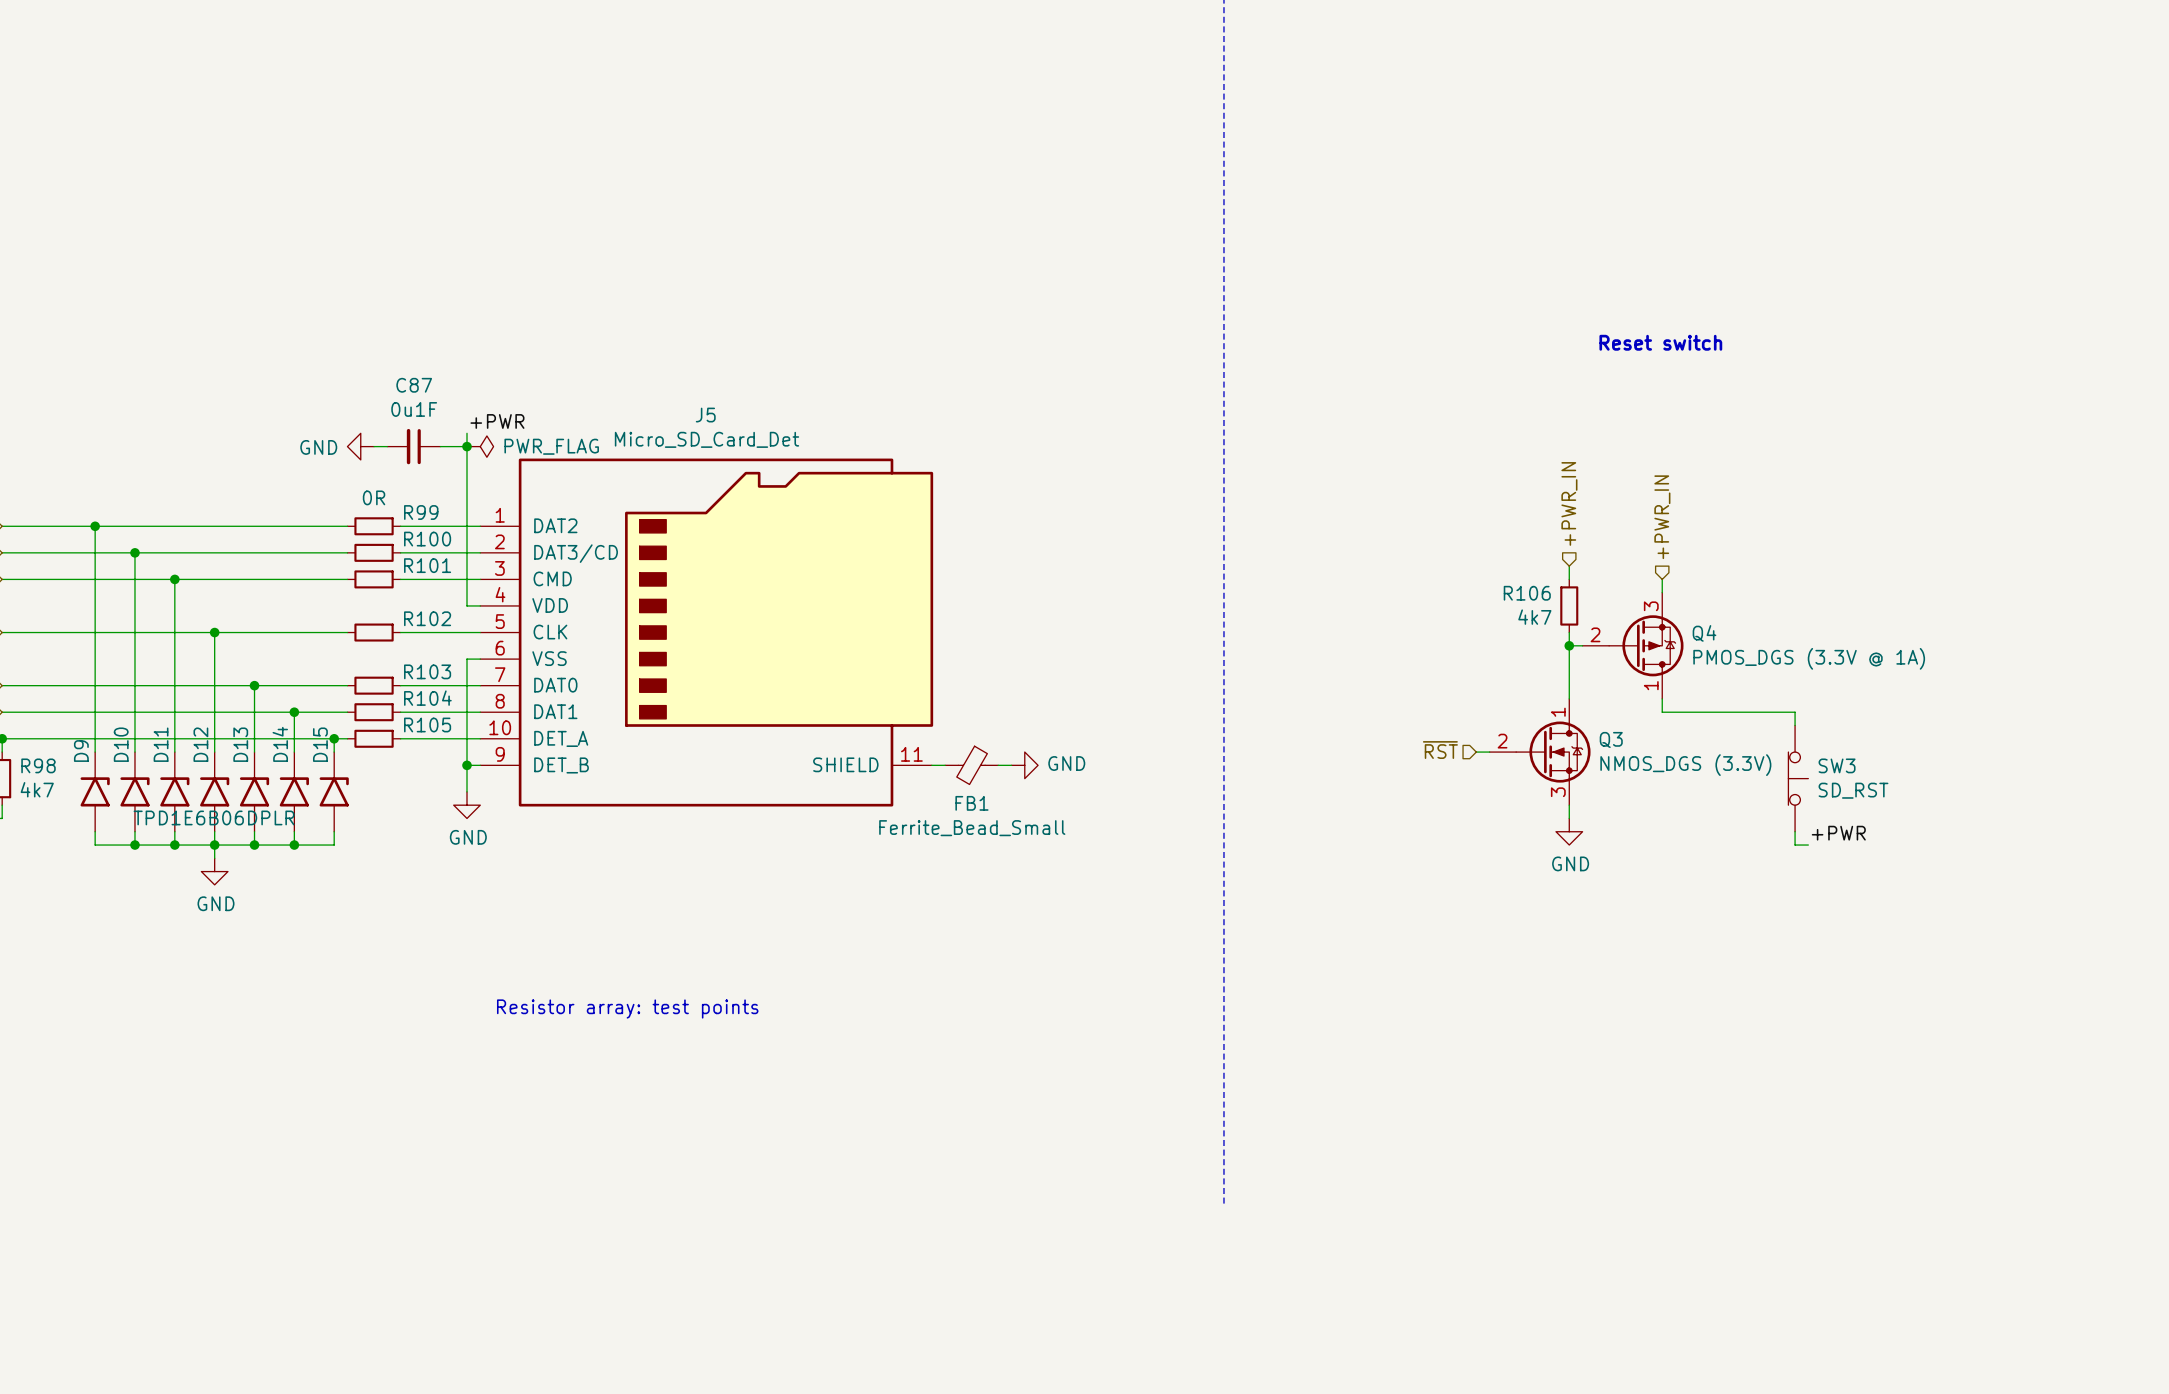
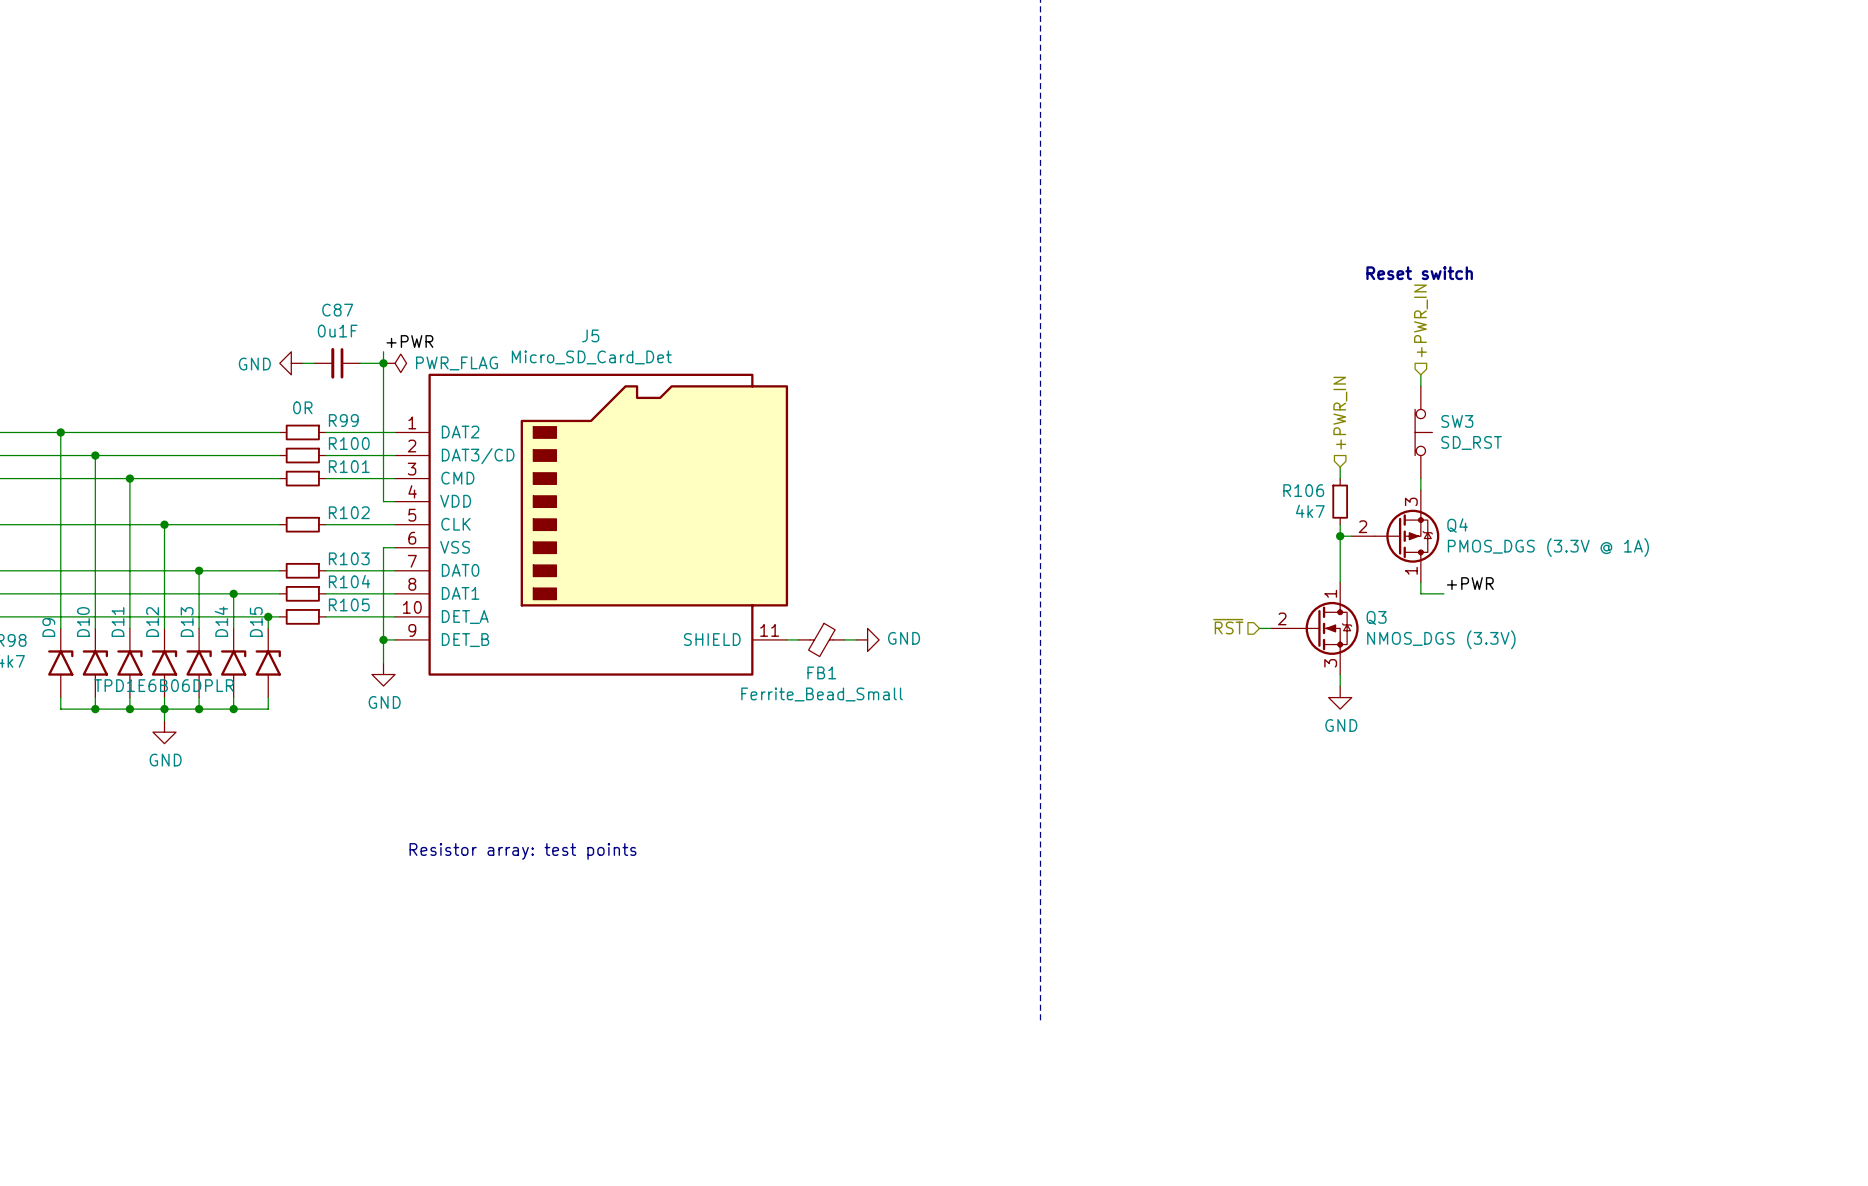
wire: none -> (1420, 374) (1420, 386)
hierarchical label position: +PWR_IN (1662, 517) -> +PWR_IN (1420, 320)
wire: (1688, 712) (1795, 712) (1795, 725) -> none
SW3 position: (1798, 778) -> (1423, 432)
wire: (1795, 831) (1795, 845) (1808, 845) -> none
label position: +PWR (1838, 833) -> +PWR (1470, 583)

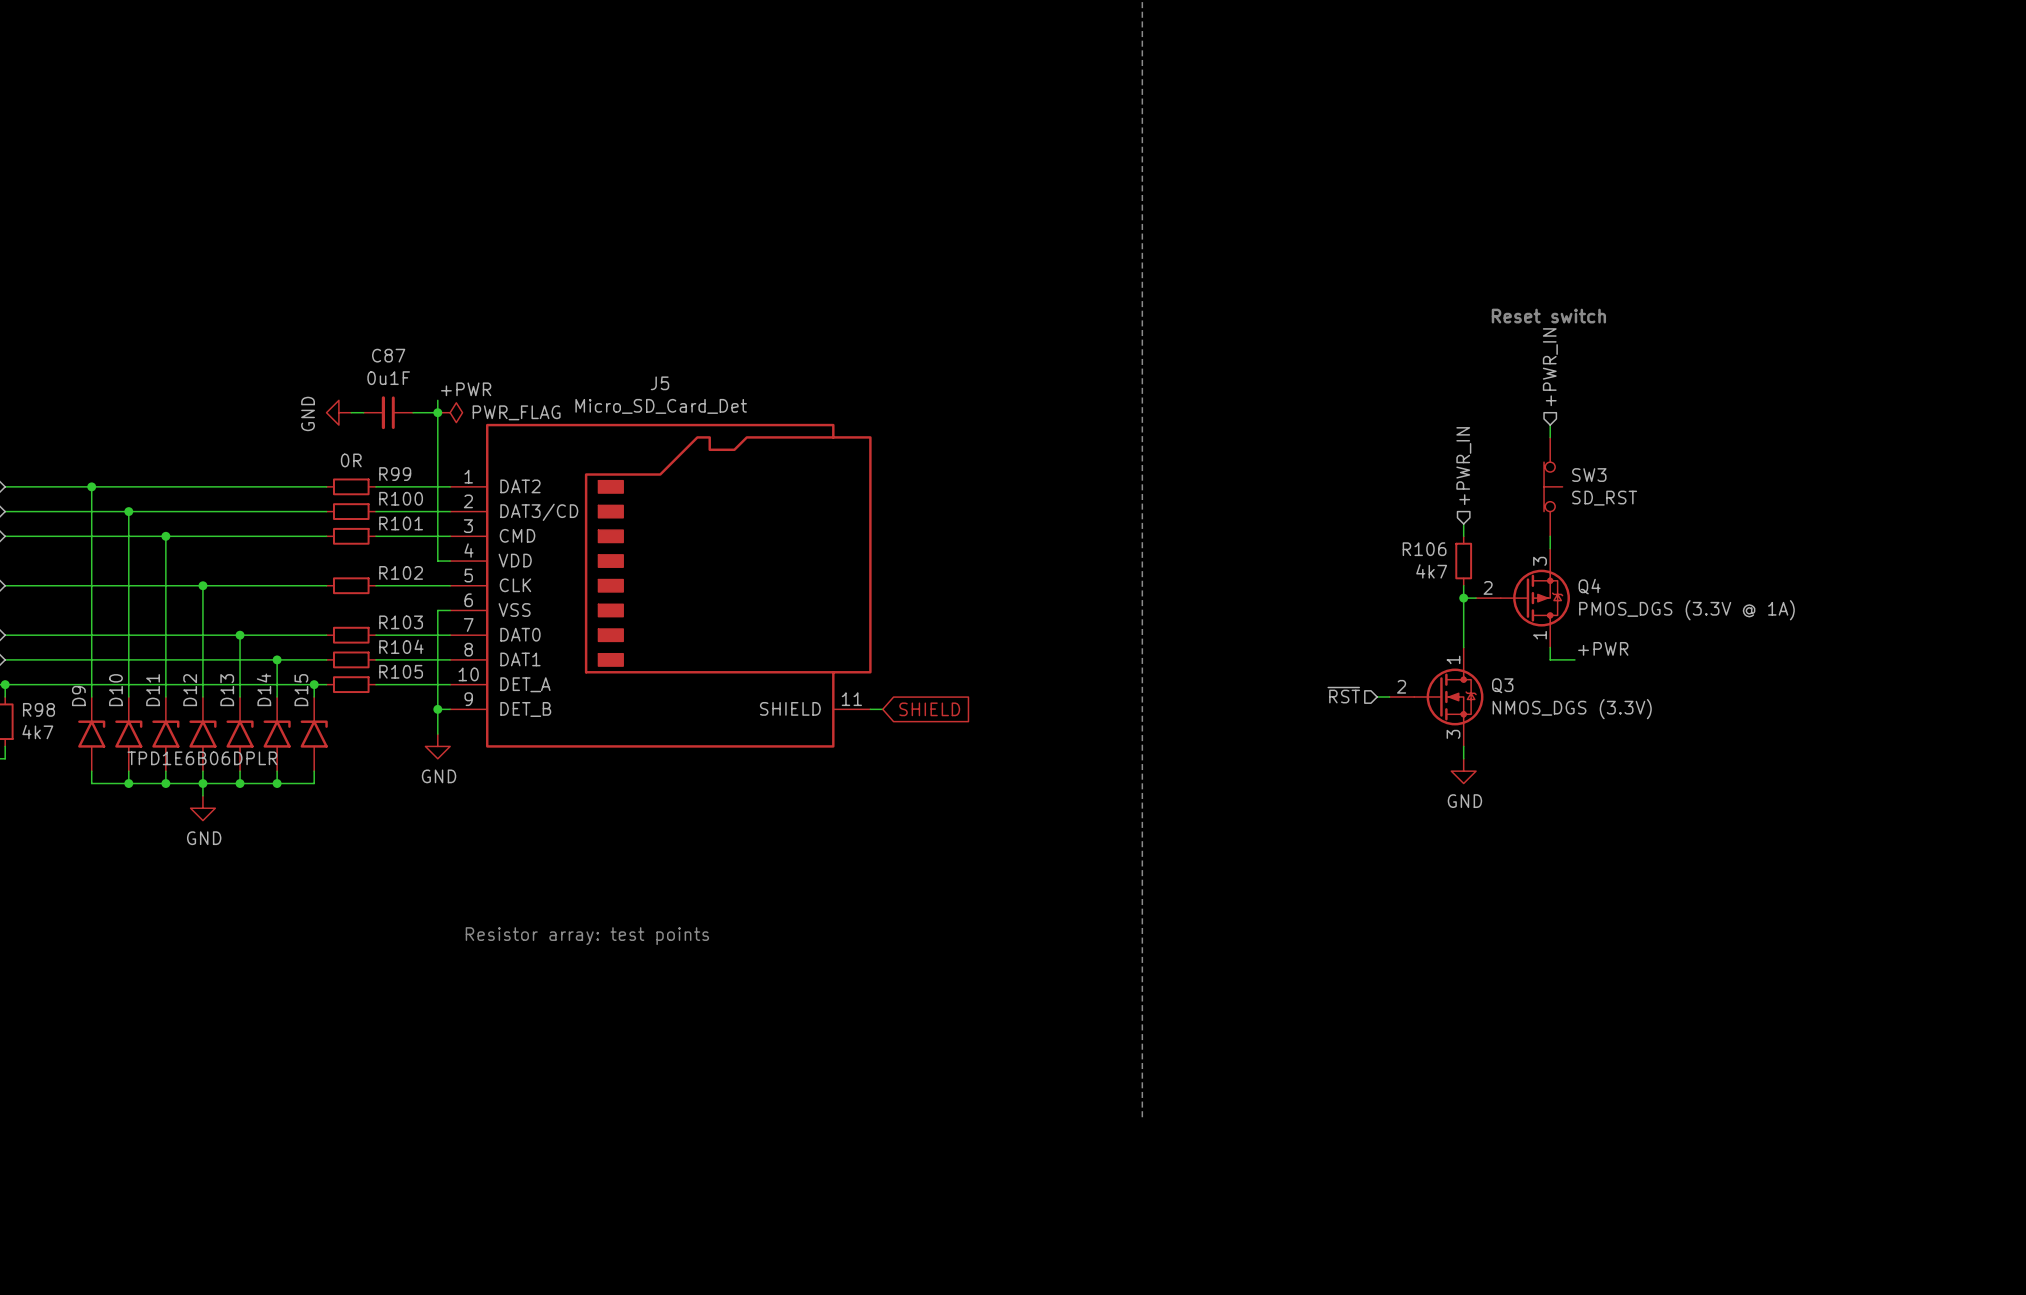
power symbol text rotation: 0° (254, 364) -> 90° counterclockwise (308, 413)
FB1: Ferrite_Bead_Small (821, 639) -> none
global label: none -> SHIELD (929, 709)
wire: (844, 639) (856, 639) -> none
power symbol: GND (867, 639) -> none

